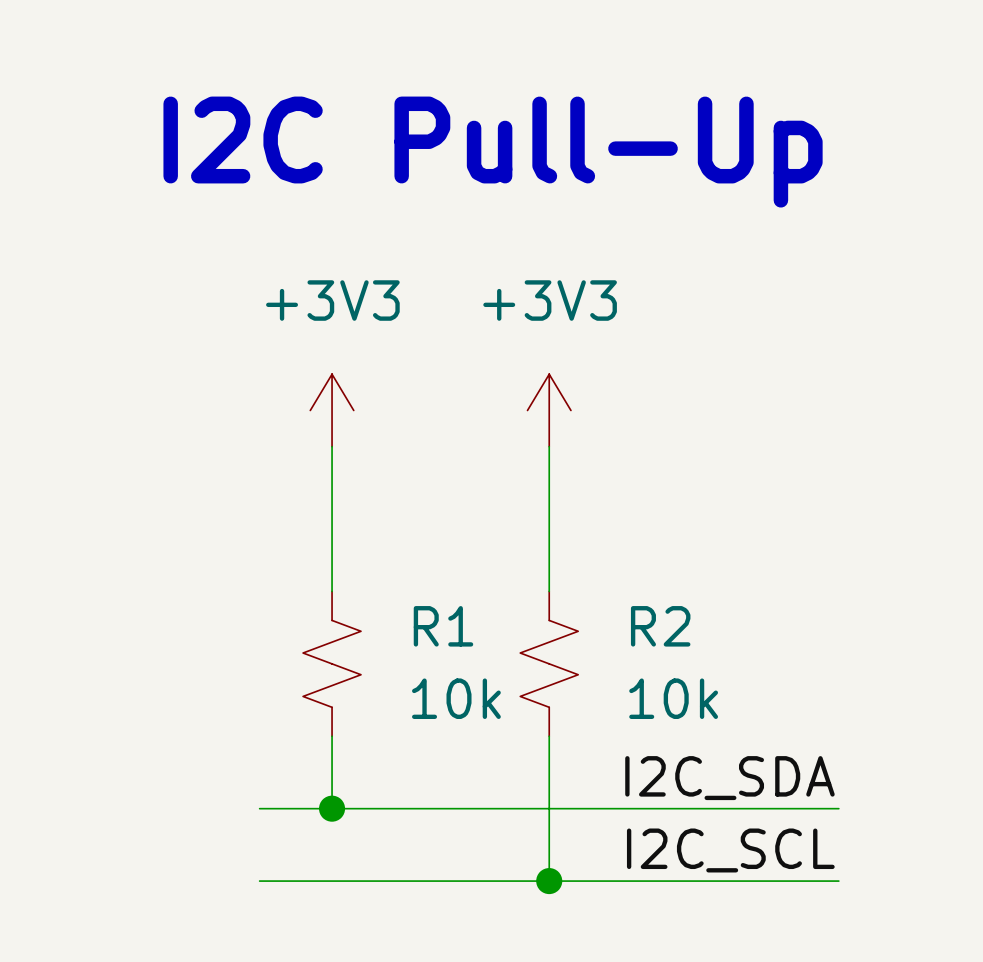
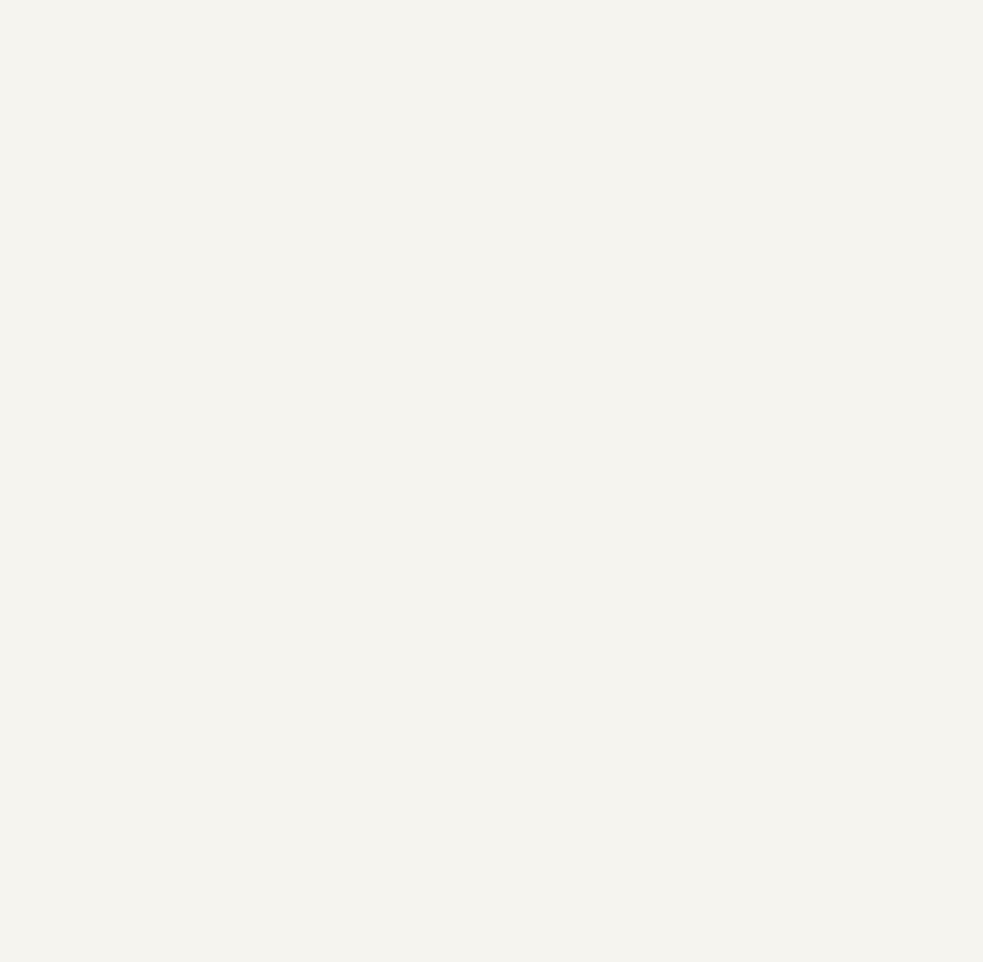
text: I2C Pull-Up (493, 152) -> none
power symbol: +3V3 (332, 410) -> none
power symbol: +3V3 (549, 410) -> none
wire: (332, 446) (332, 591) -> none
wire: (549, 446) (549, 591) -> none
R1: 10k (332, 663) -> none
R2: 10k (549, 663) -> none
wire: (332, 736) (332, 808) -> none
wire: (549, 736) (549, 881) -> none
label: I2C_SDA (729, 778) -> none
wire: (259, 808) (838, 808) -> none
junction: (332, 808) -> none
label: I2C_SCL (730, 850) -> none
wire: (259, 881) (838, 881) -> none
junction: (549, 881) -> none

